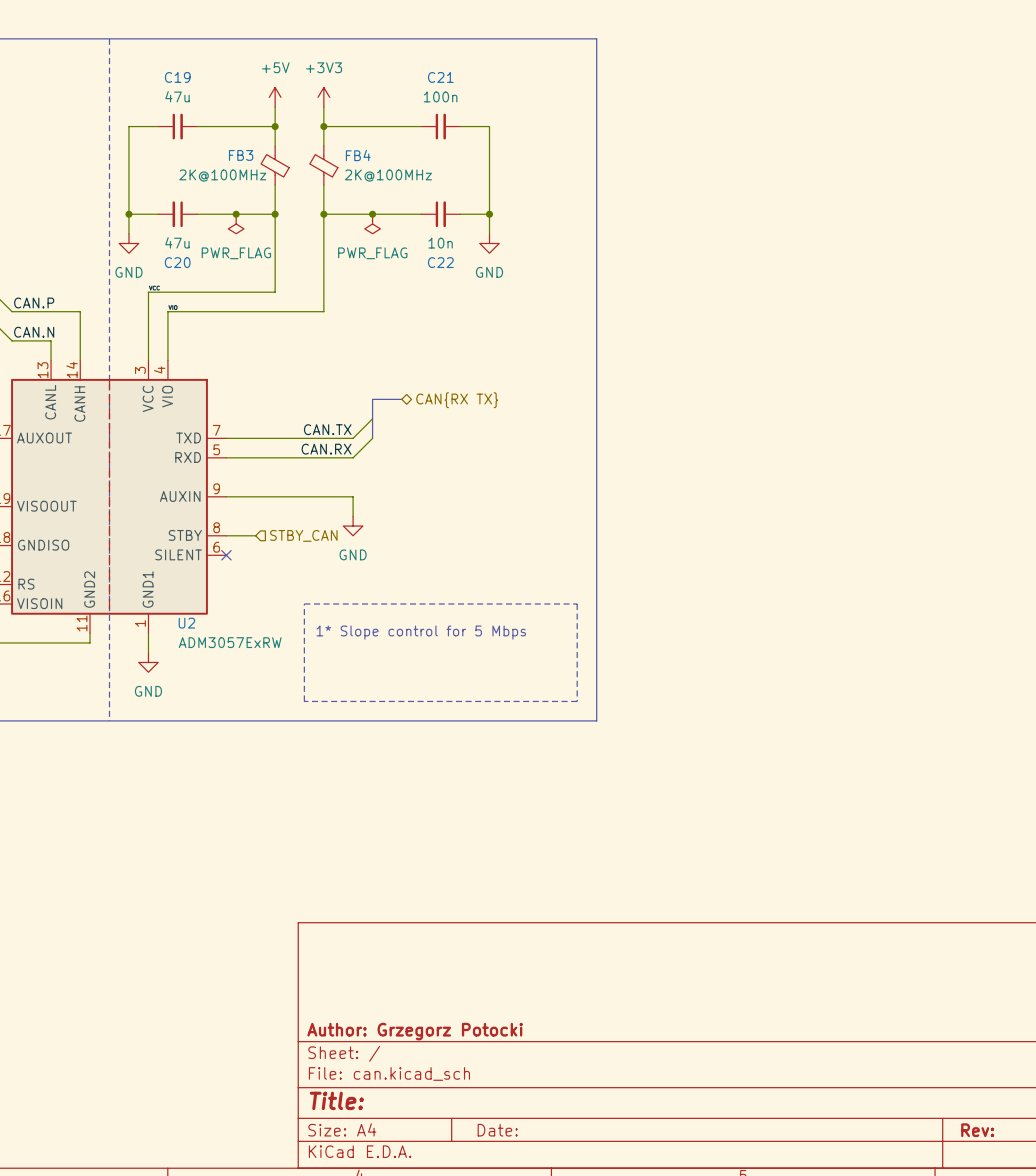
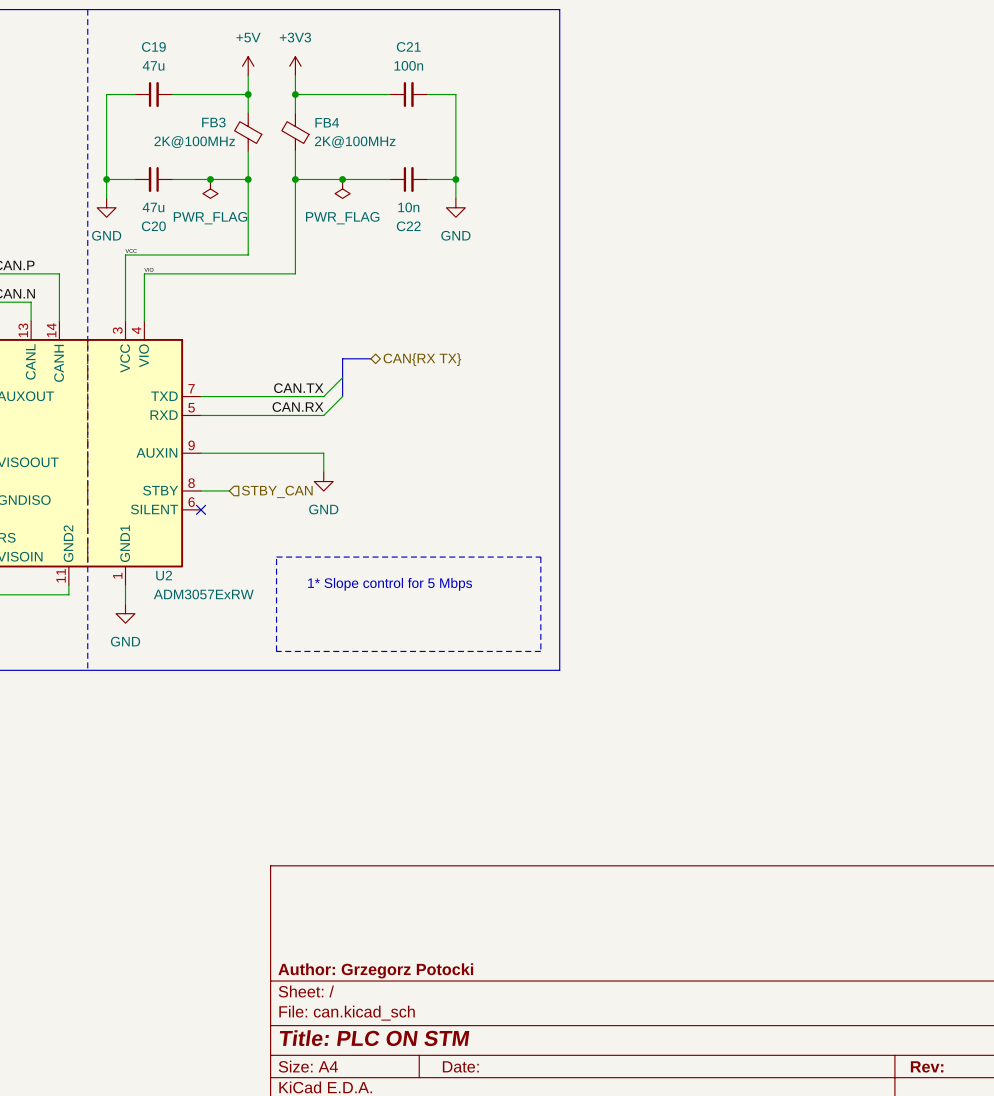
title block: Title: (336, 1100) -> Title: PLC ON STM (374, 1038)

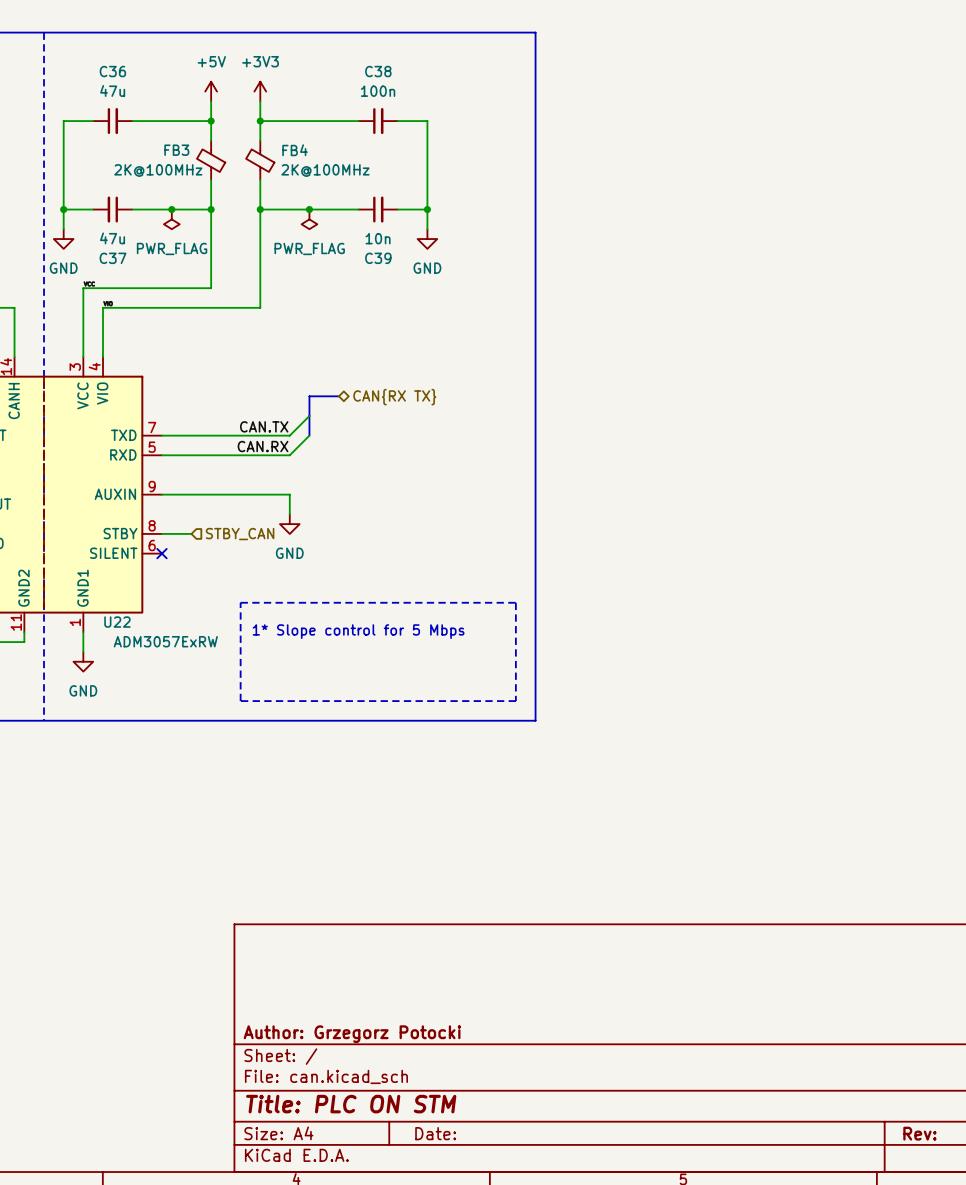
C19 name: C19 (153, 46) -> C36 (112, 71)
C21 name: C21 (408, 46) -> C38 (378, 71)
C20 name: C20 (153, 226) -> C37 (113, 258)
C22 name: C22 (408, 226) -> C39 (378, 258)
U2 name: U2 (164, 575) -> U22 (117, 622)

